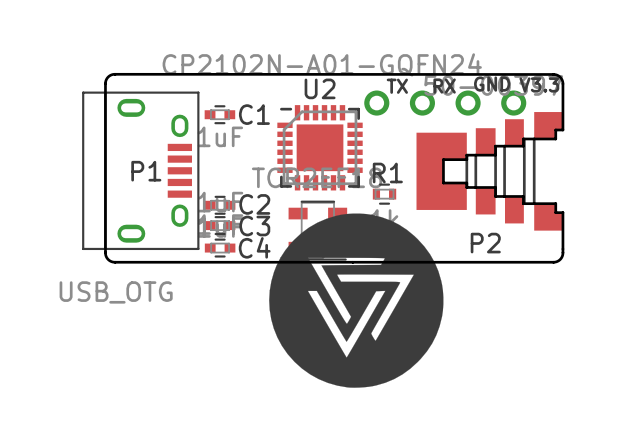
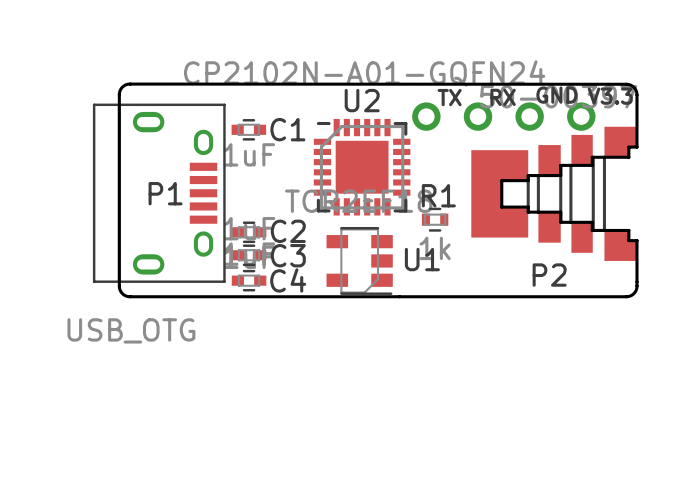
drawing: [269, 213, 444, 388] -> none

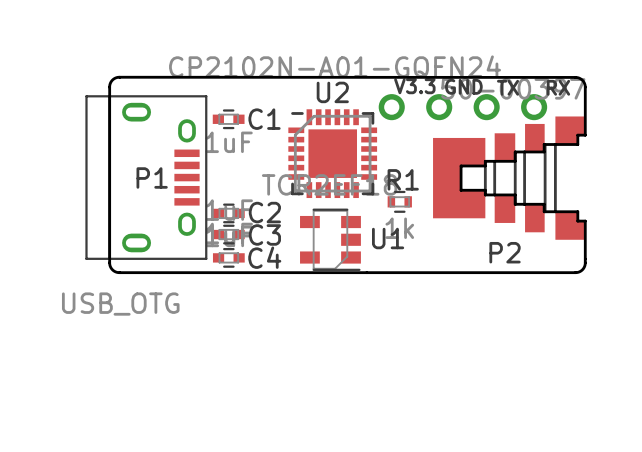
text position: GND (556, 95) -> GND (463, 86)
text position: V3.3 (610, 96) -> V3.3 (414, 86)
text position: TX (449, 97) -> TX (508, 87)
text position: RX (503, 97) -> RX (558, 87)

